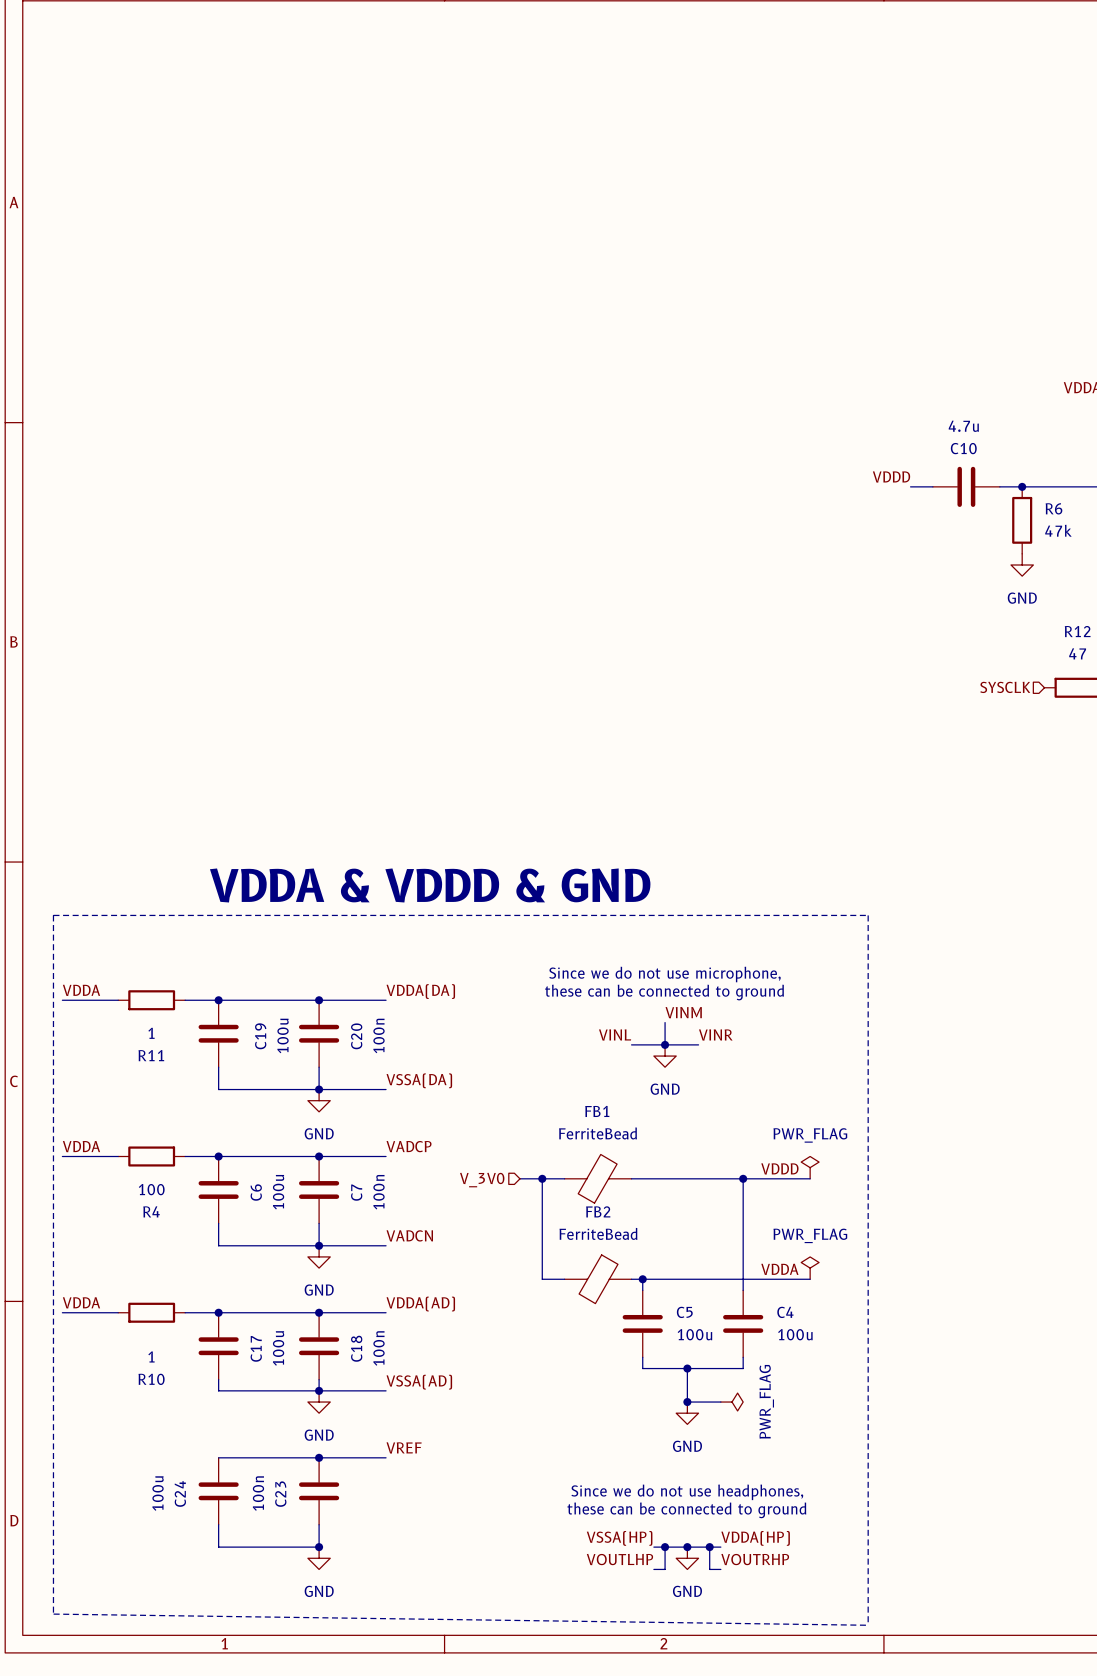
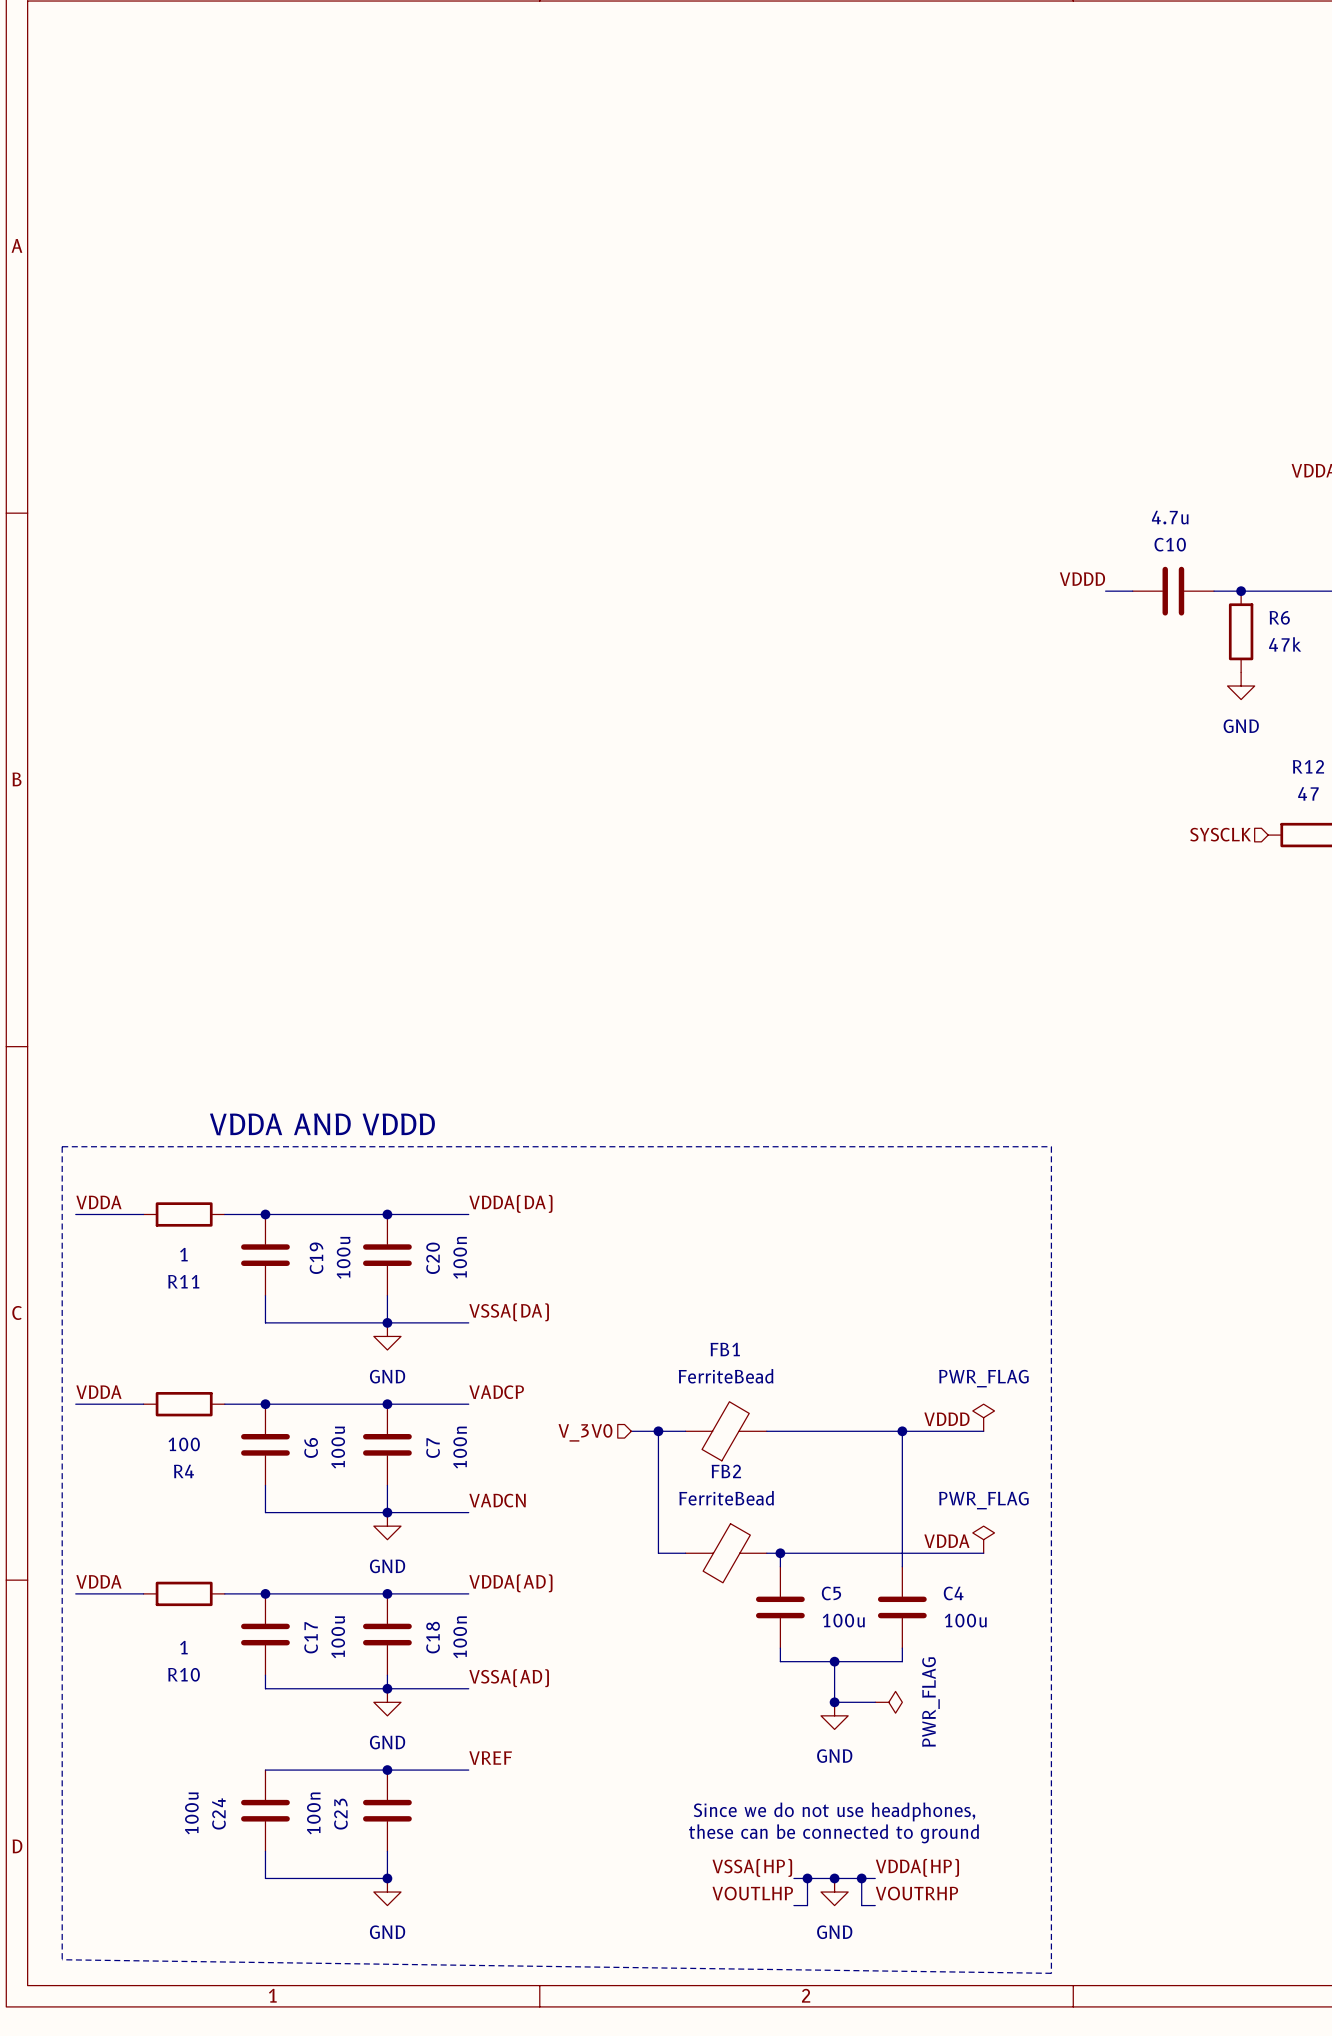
text: VDDA & VDDD & GND (430, 885) -> VDDA AND VDDD (322, 1124)
text: Since we do not use microphone, (664, 974) -> none
text: these can be connected to ground (664, 992) -> none
label: VINM (683, 1012) -> none
wire: (665, 1022) (665, 1044) -> none
label: VINL (615, 1035) -> none
label: VINR (715, 1035) -> none
wire: (631, 1044) (698, 1044) -> none
junction: (665, 1044) -> none
power symbol: GND (665, 1056) -> none
line: none -> (62, 1959) (62, 1146) (1051, 1146) (1051, 1973)
line: (53, 1614) (53, 915) (868, 915) (868, 1625) -> none

